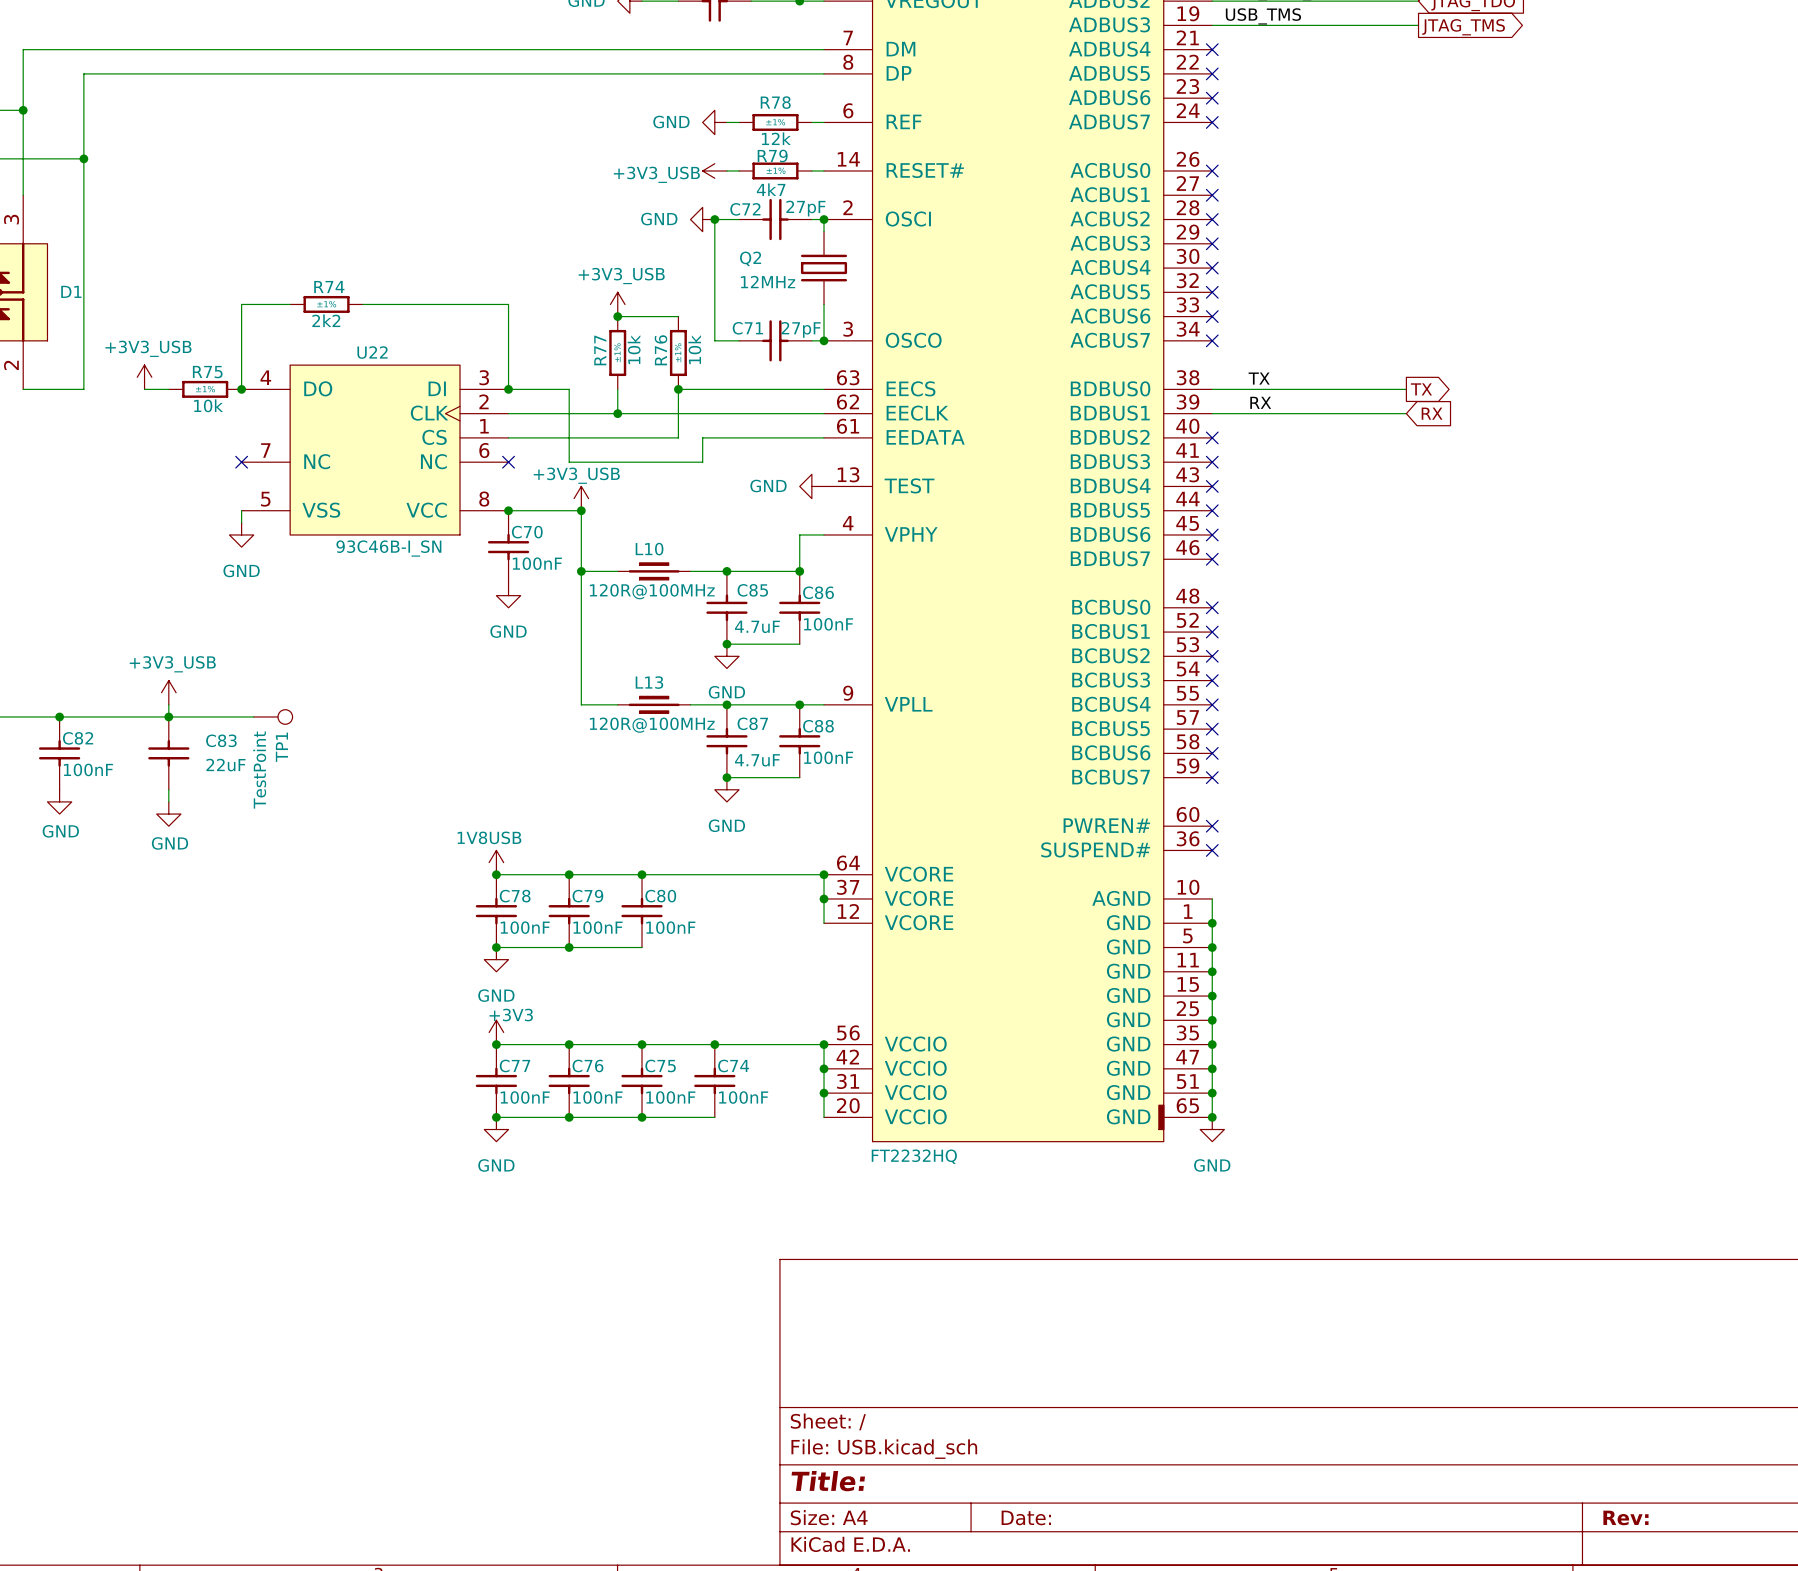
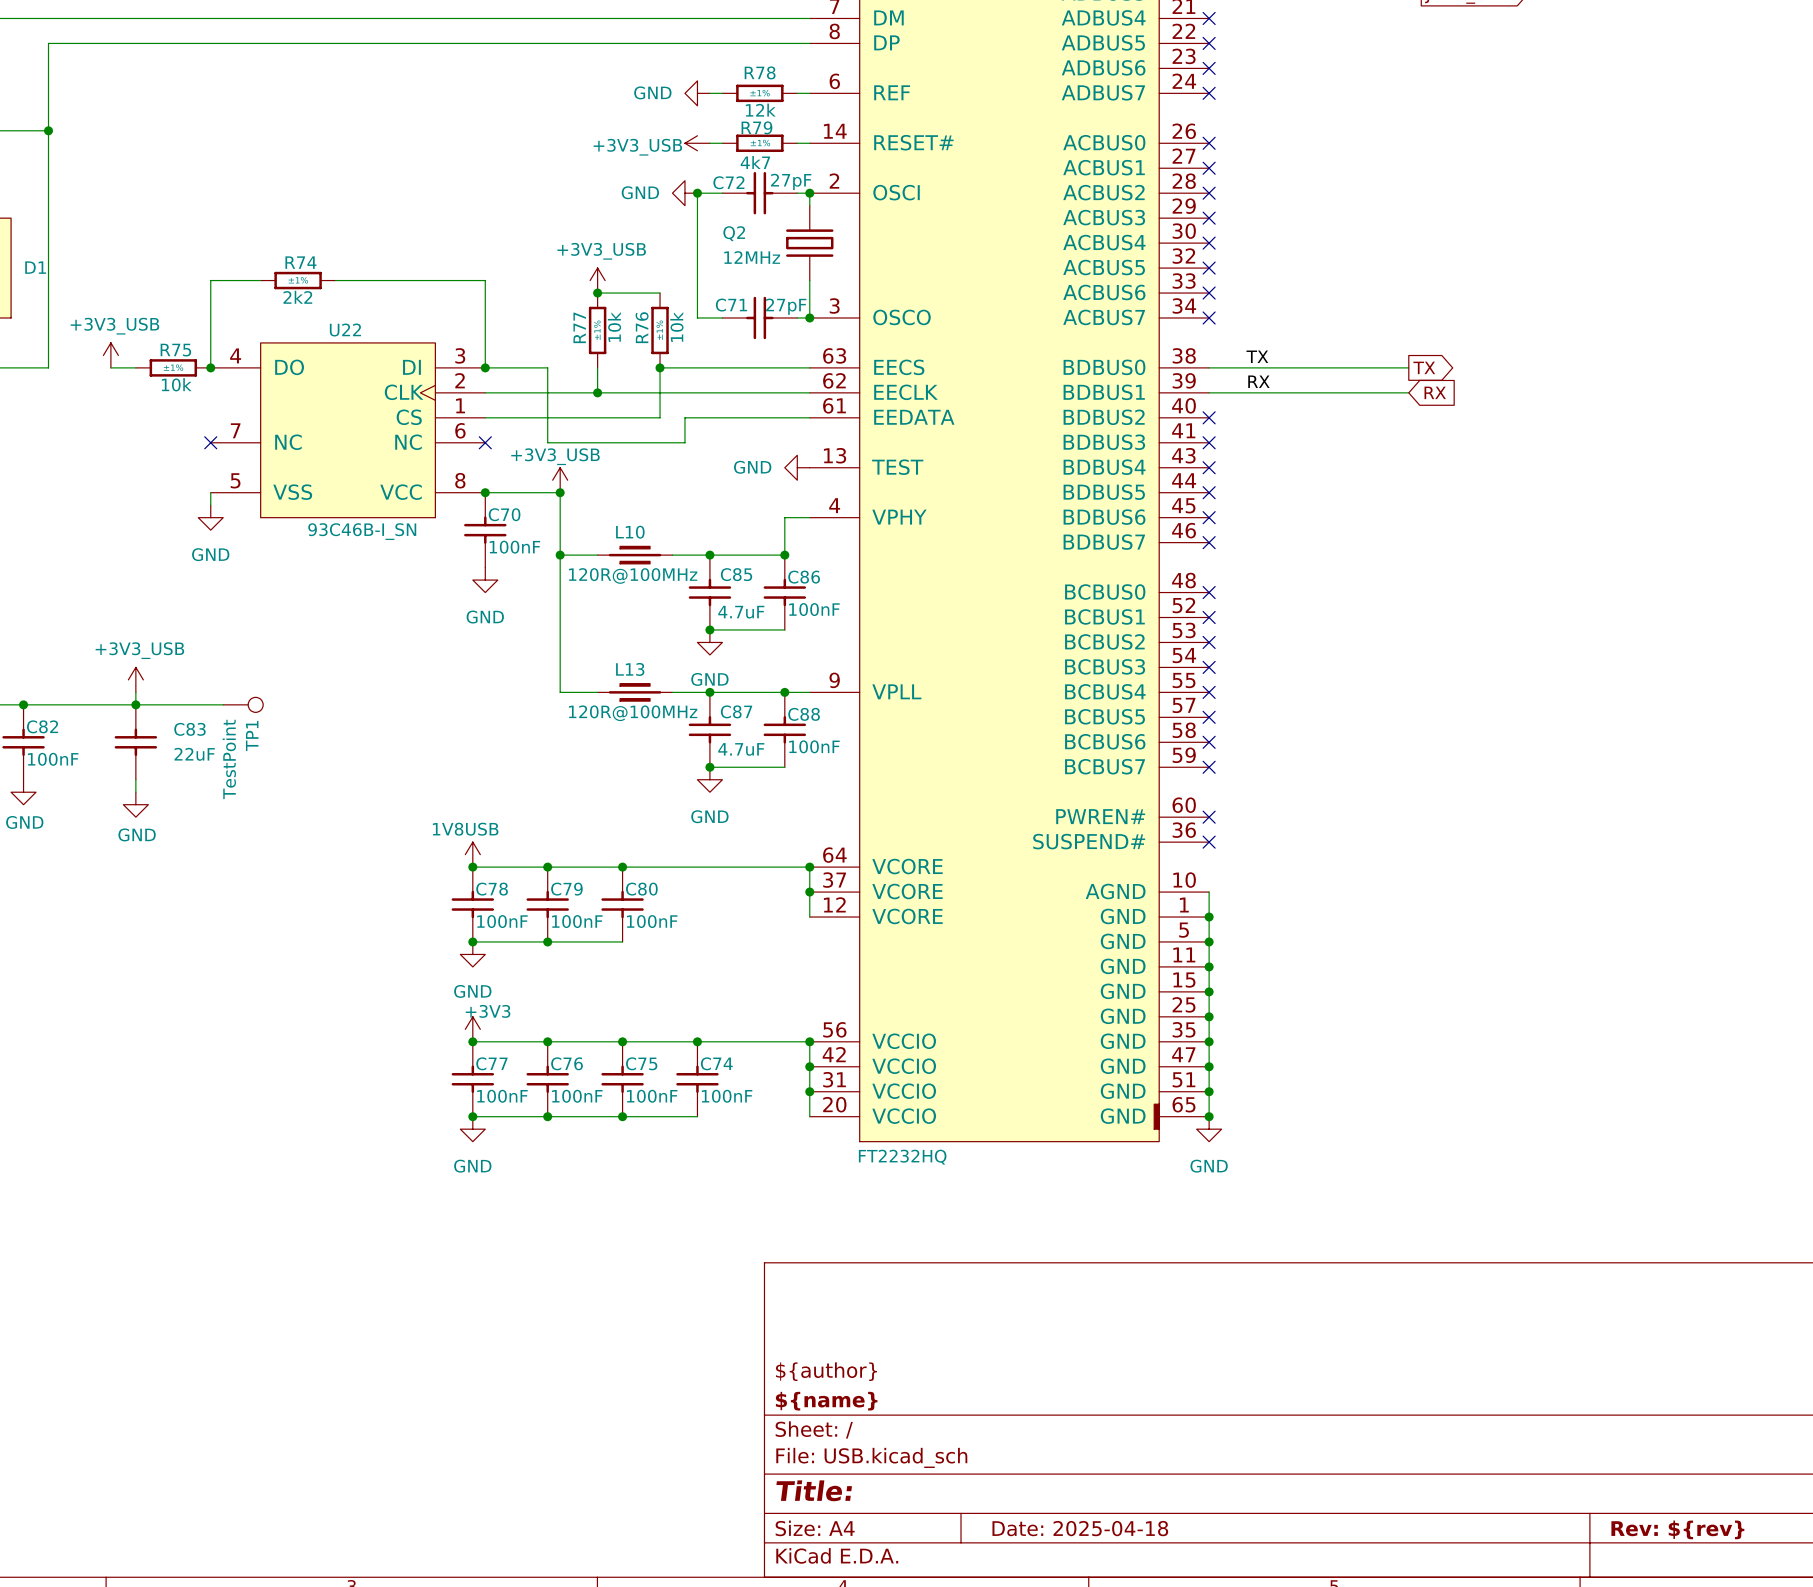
title block: none -> ${author} (826, 1371)
title block: none -> ${name} (826, 1401)
title block: Date: (1026, 1517) -> Date: 2025-04-18 (1080, 1528)
title block: Rev: (1625, 1517) -> Rev: ${rev} (1677, 1529)

